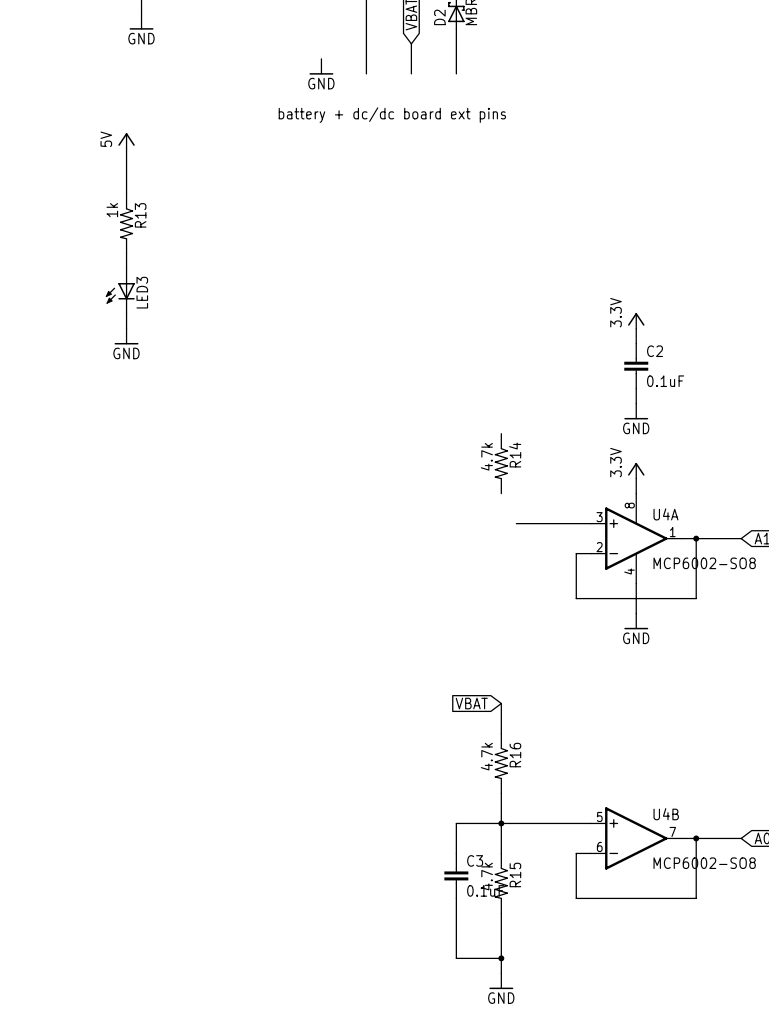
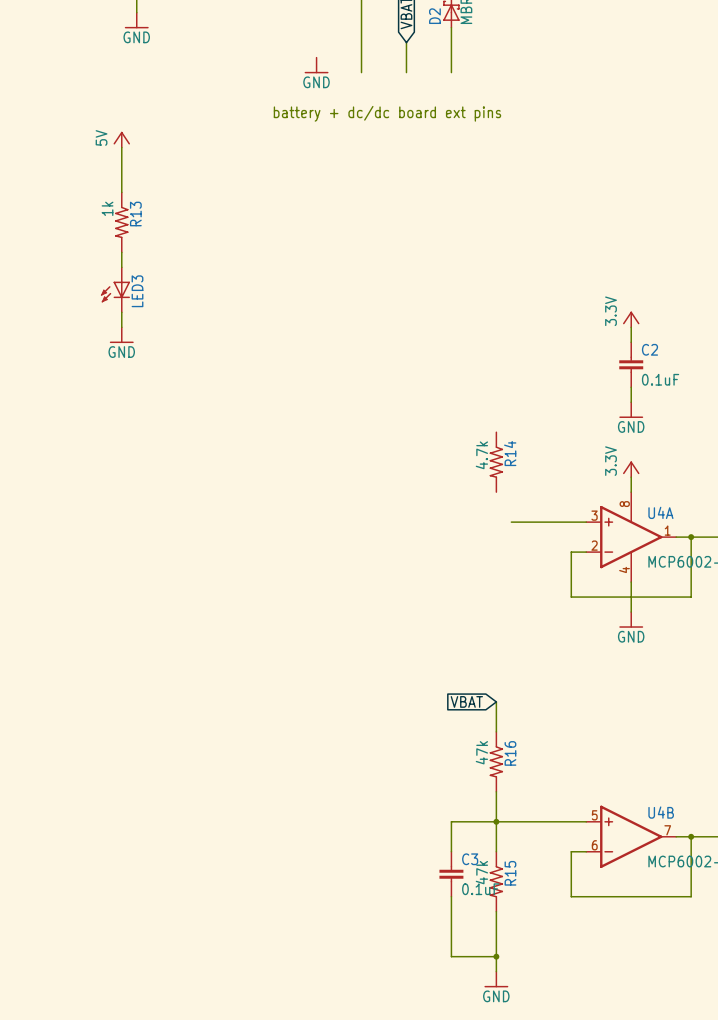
R16 value: 4.7k (486, 756) -> 47k (481, 752)
R15 value: 4.7k (486, 876) -> 47k (481, 872)

